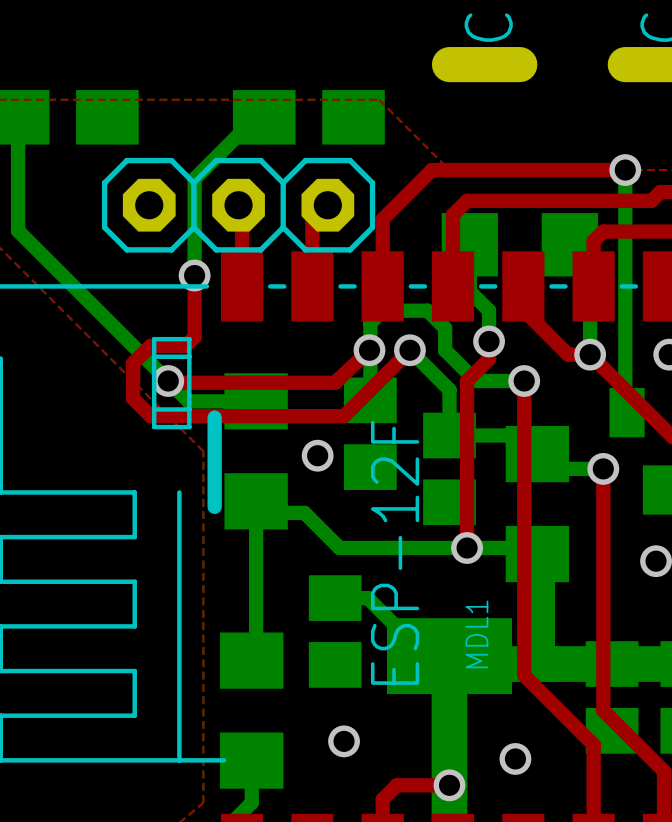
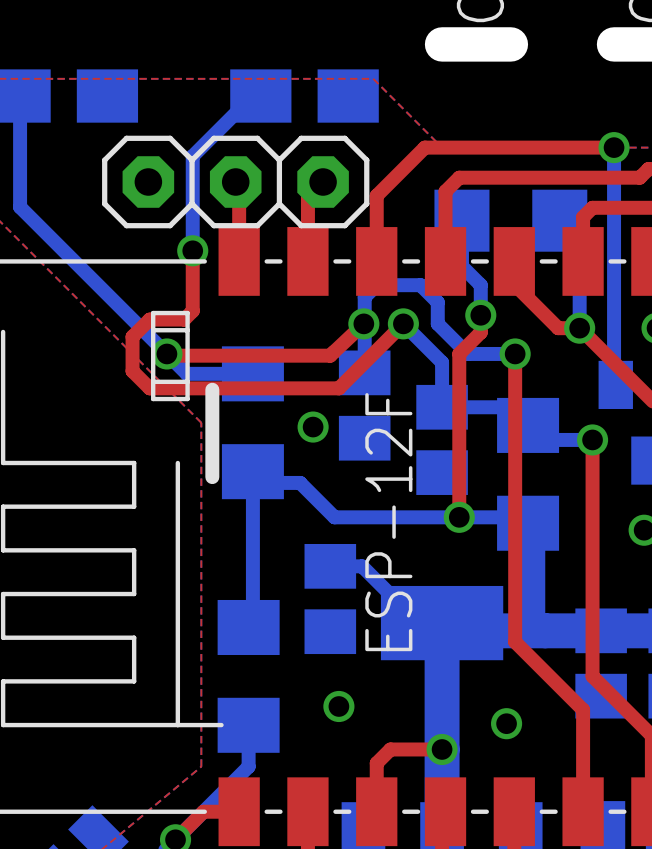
MDL1 name: MDL1 (476, 634) -> none

